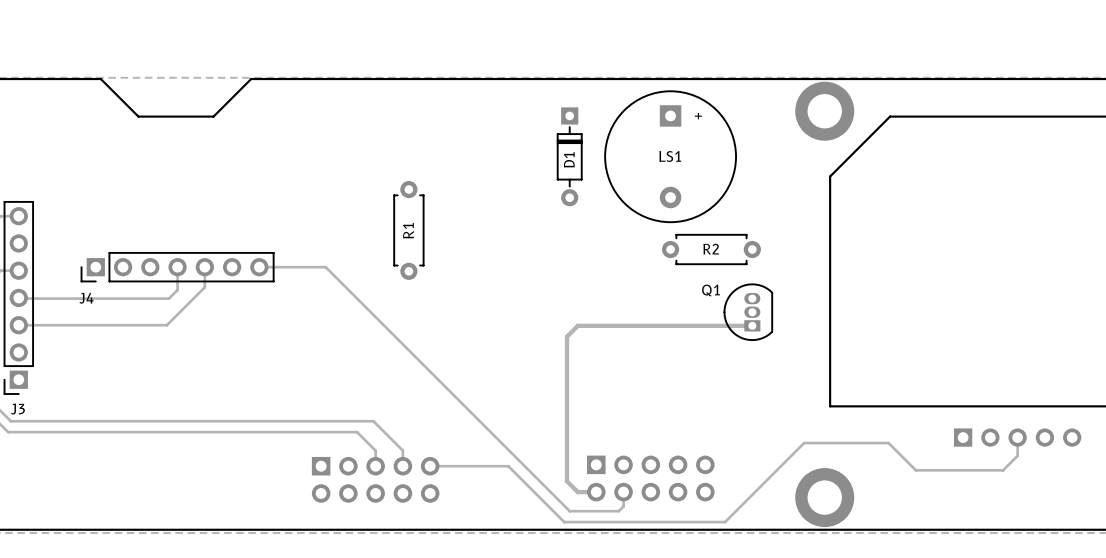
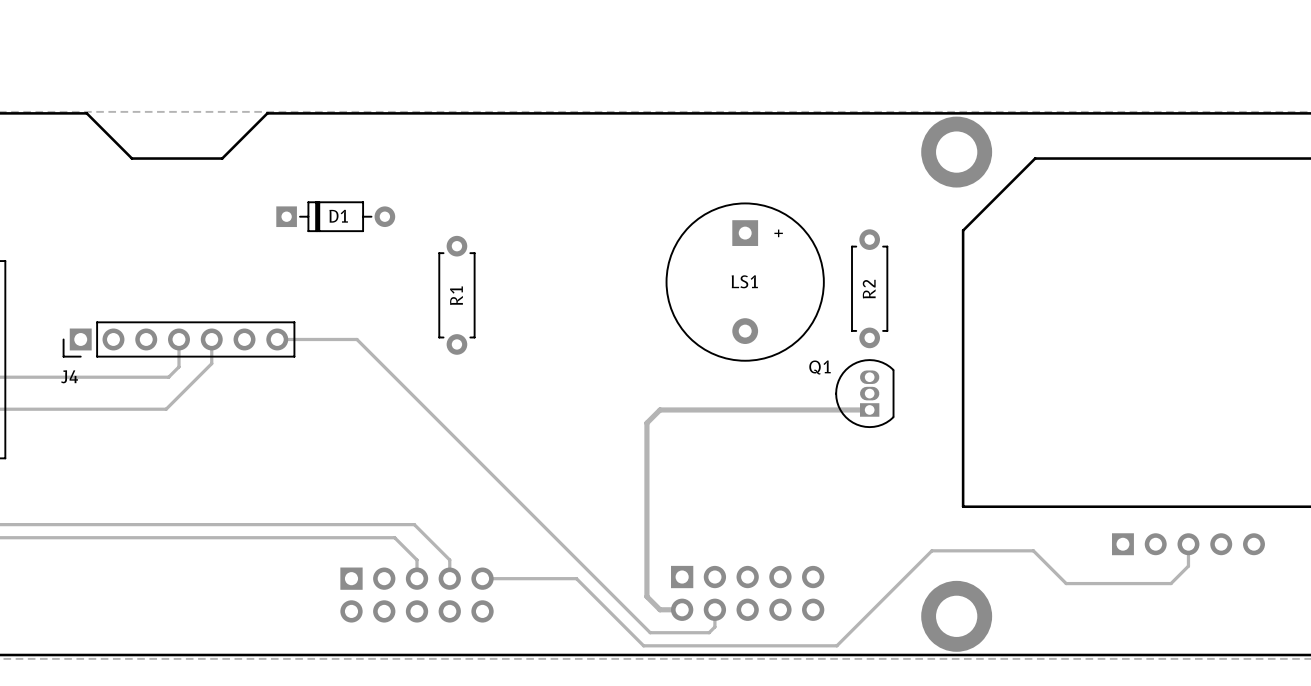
D1 rotation: 0° (569, 156) -> 90° counterclockwise (335, 216)
D1 position: (569, 156) -> (335, 216)
LS1 position: (670, 156) -> (745, 282)
R2 rotation: 0° (711, 249) -> 90° clockwise (869, 288)

